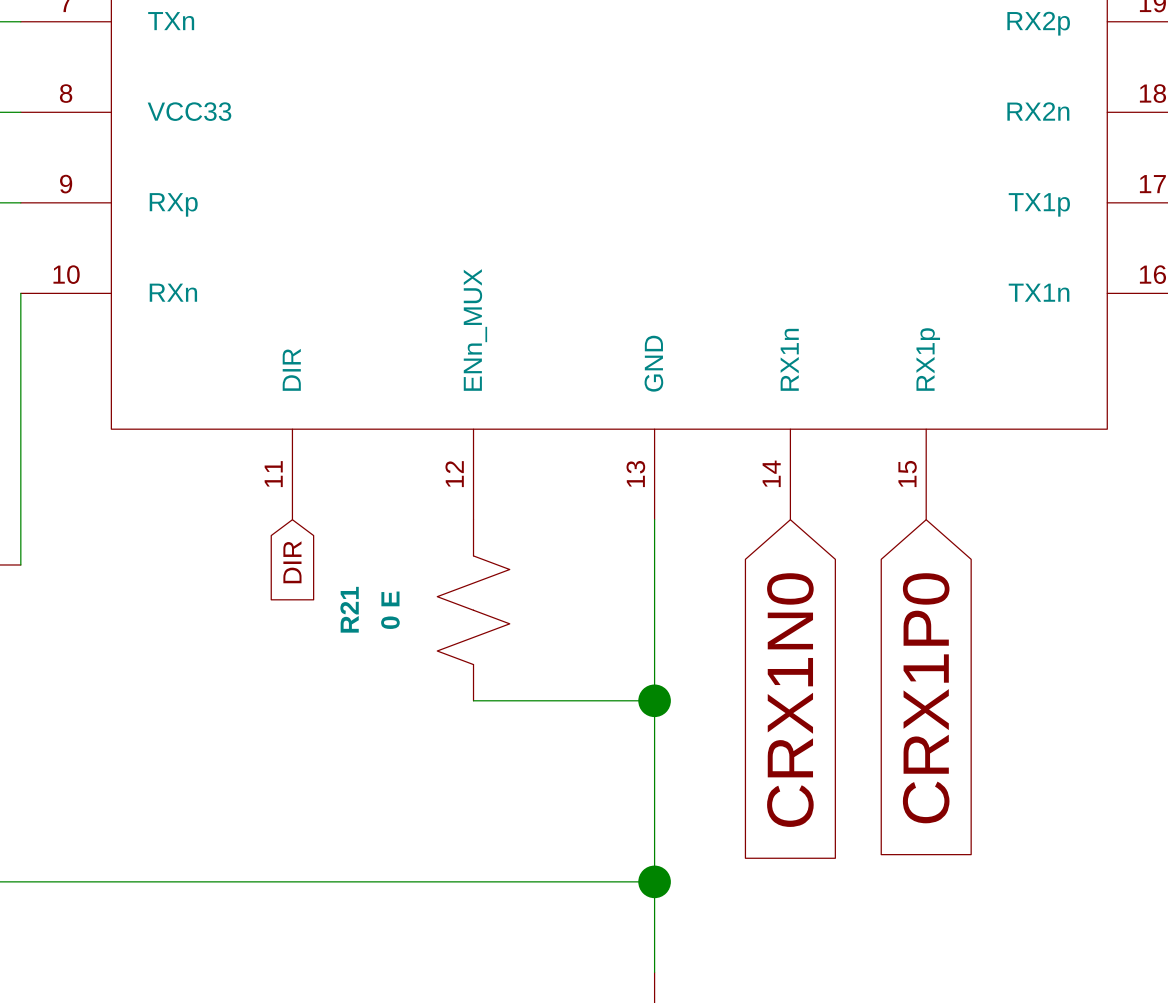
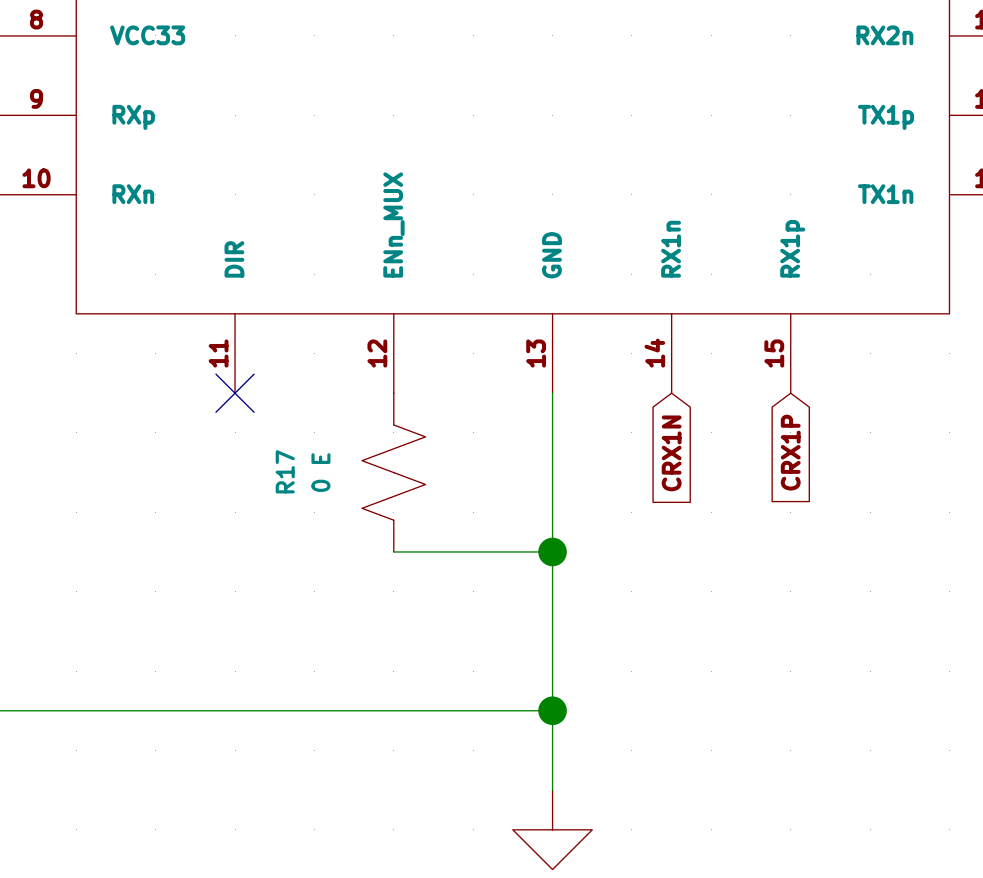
no-connect mark: none -> (235, 393)
global label: DIR (292, 562) -> none
R21 name: R21 (349, 609) -> R17 (285, 471)
global label: CRX1P0 (926, 698) -> CRX1P (790, 452)
global label: CRX1N0 (790, 700) -> CRX1N (671, 453)

